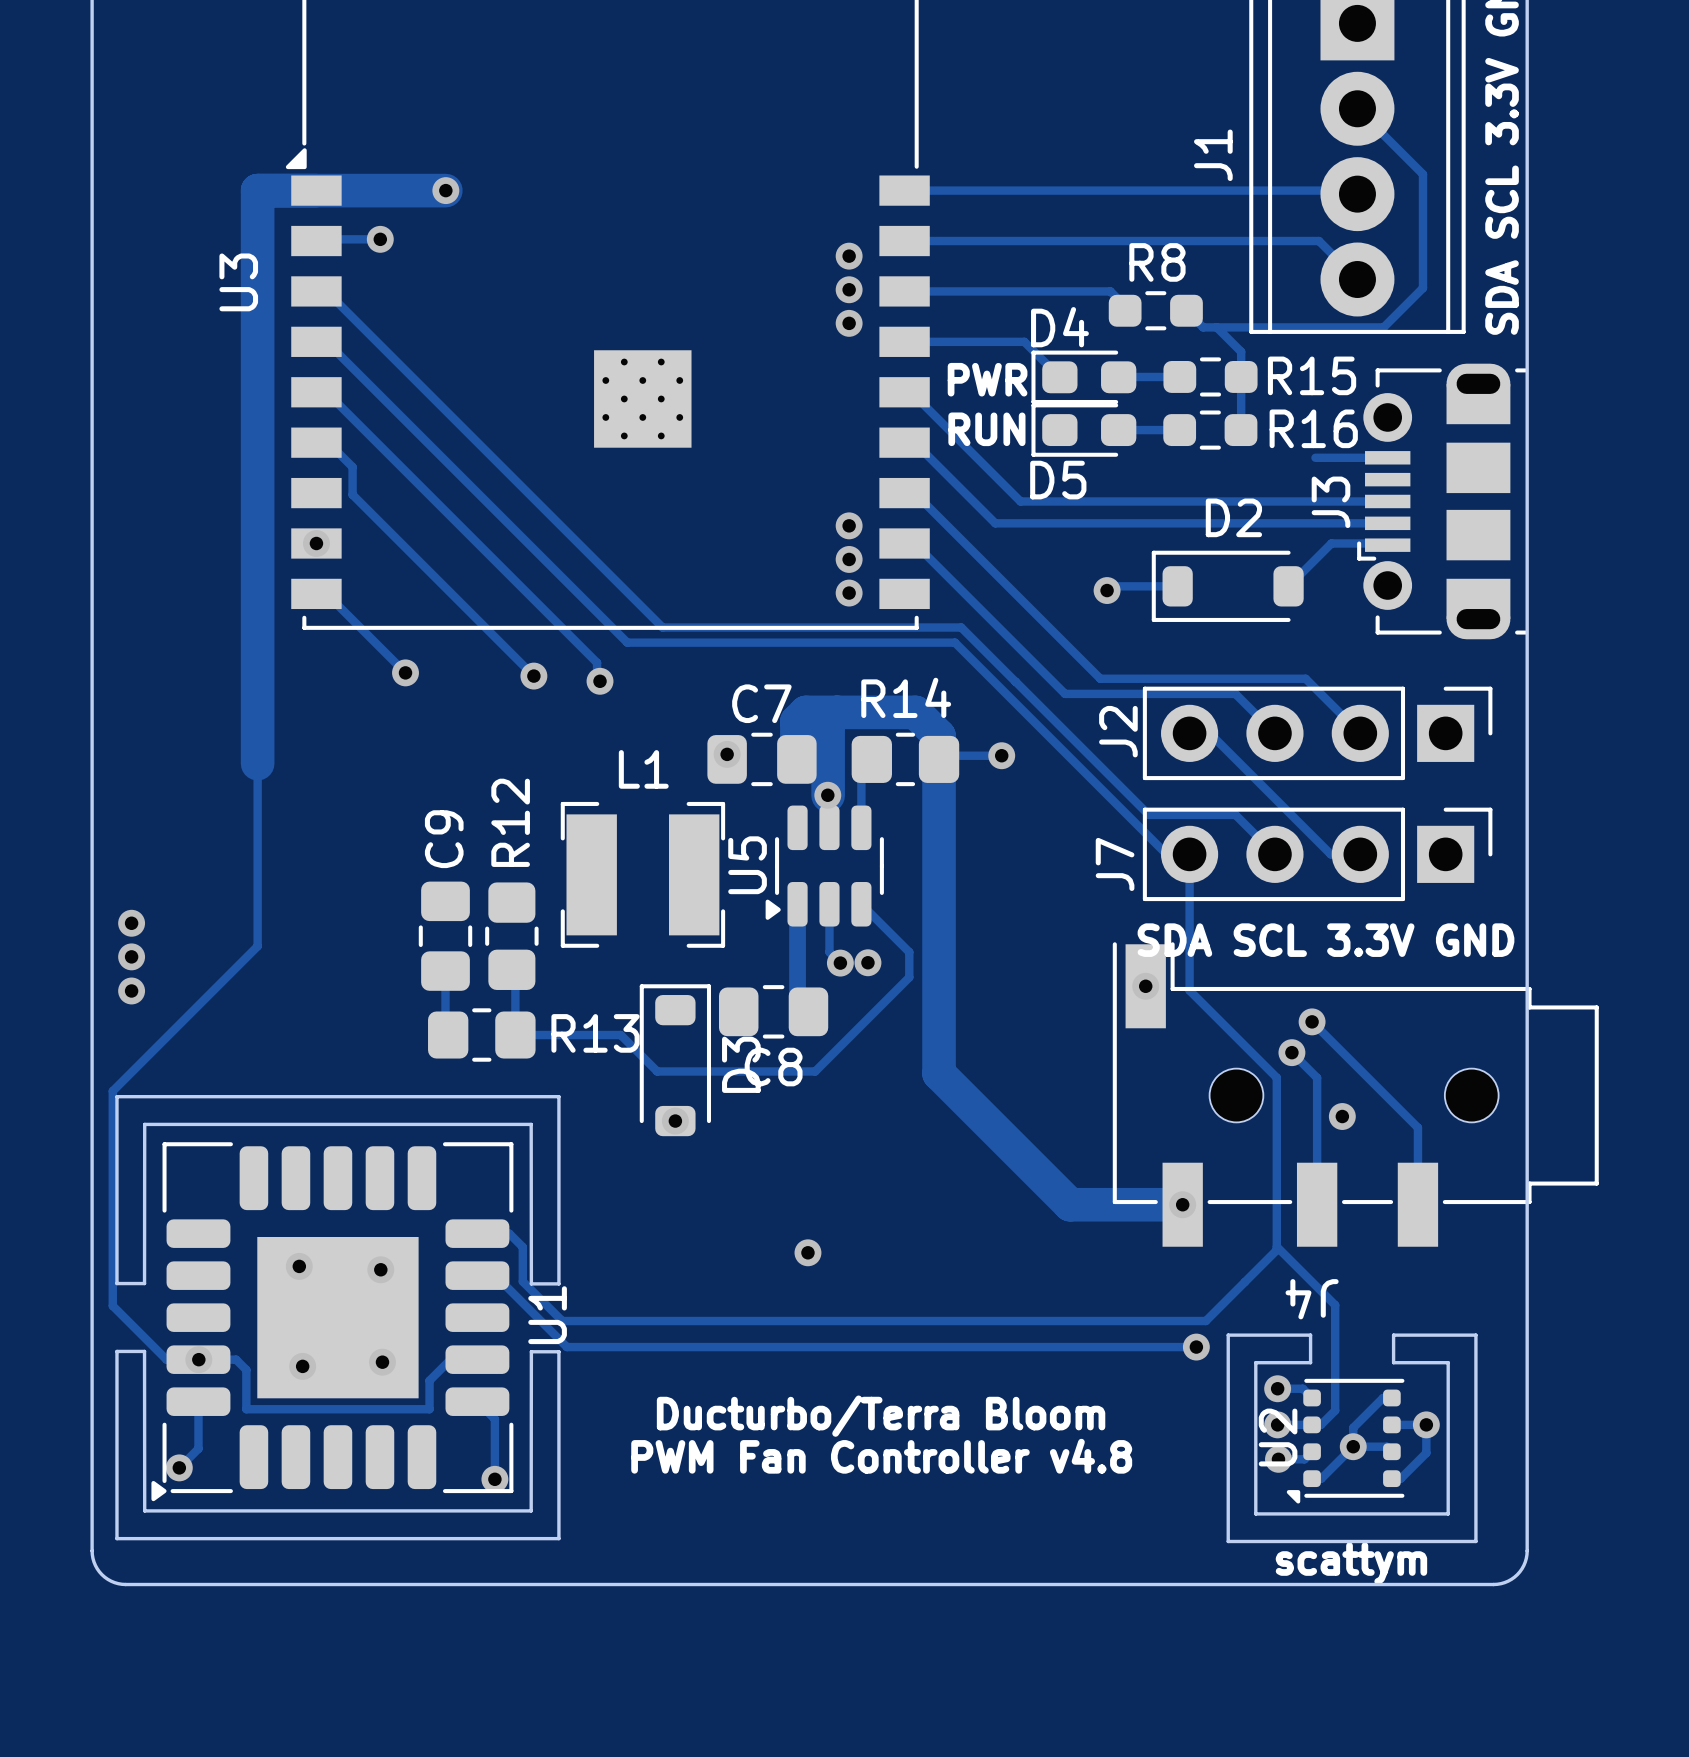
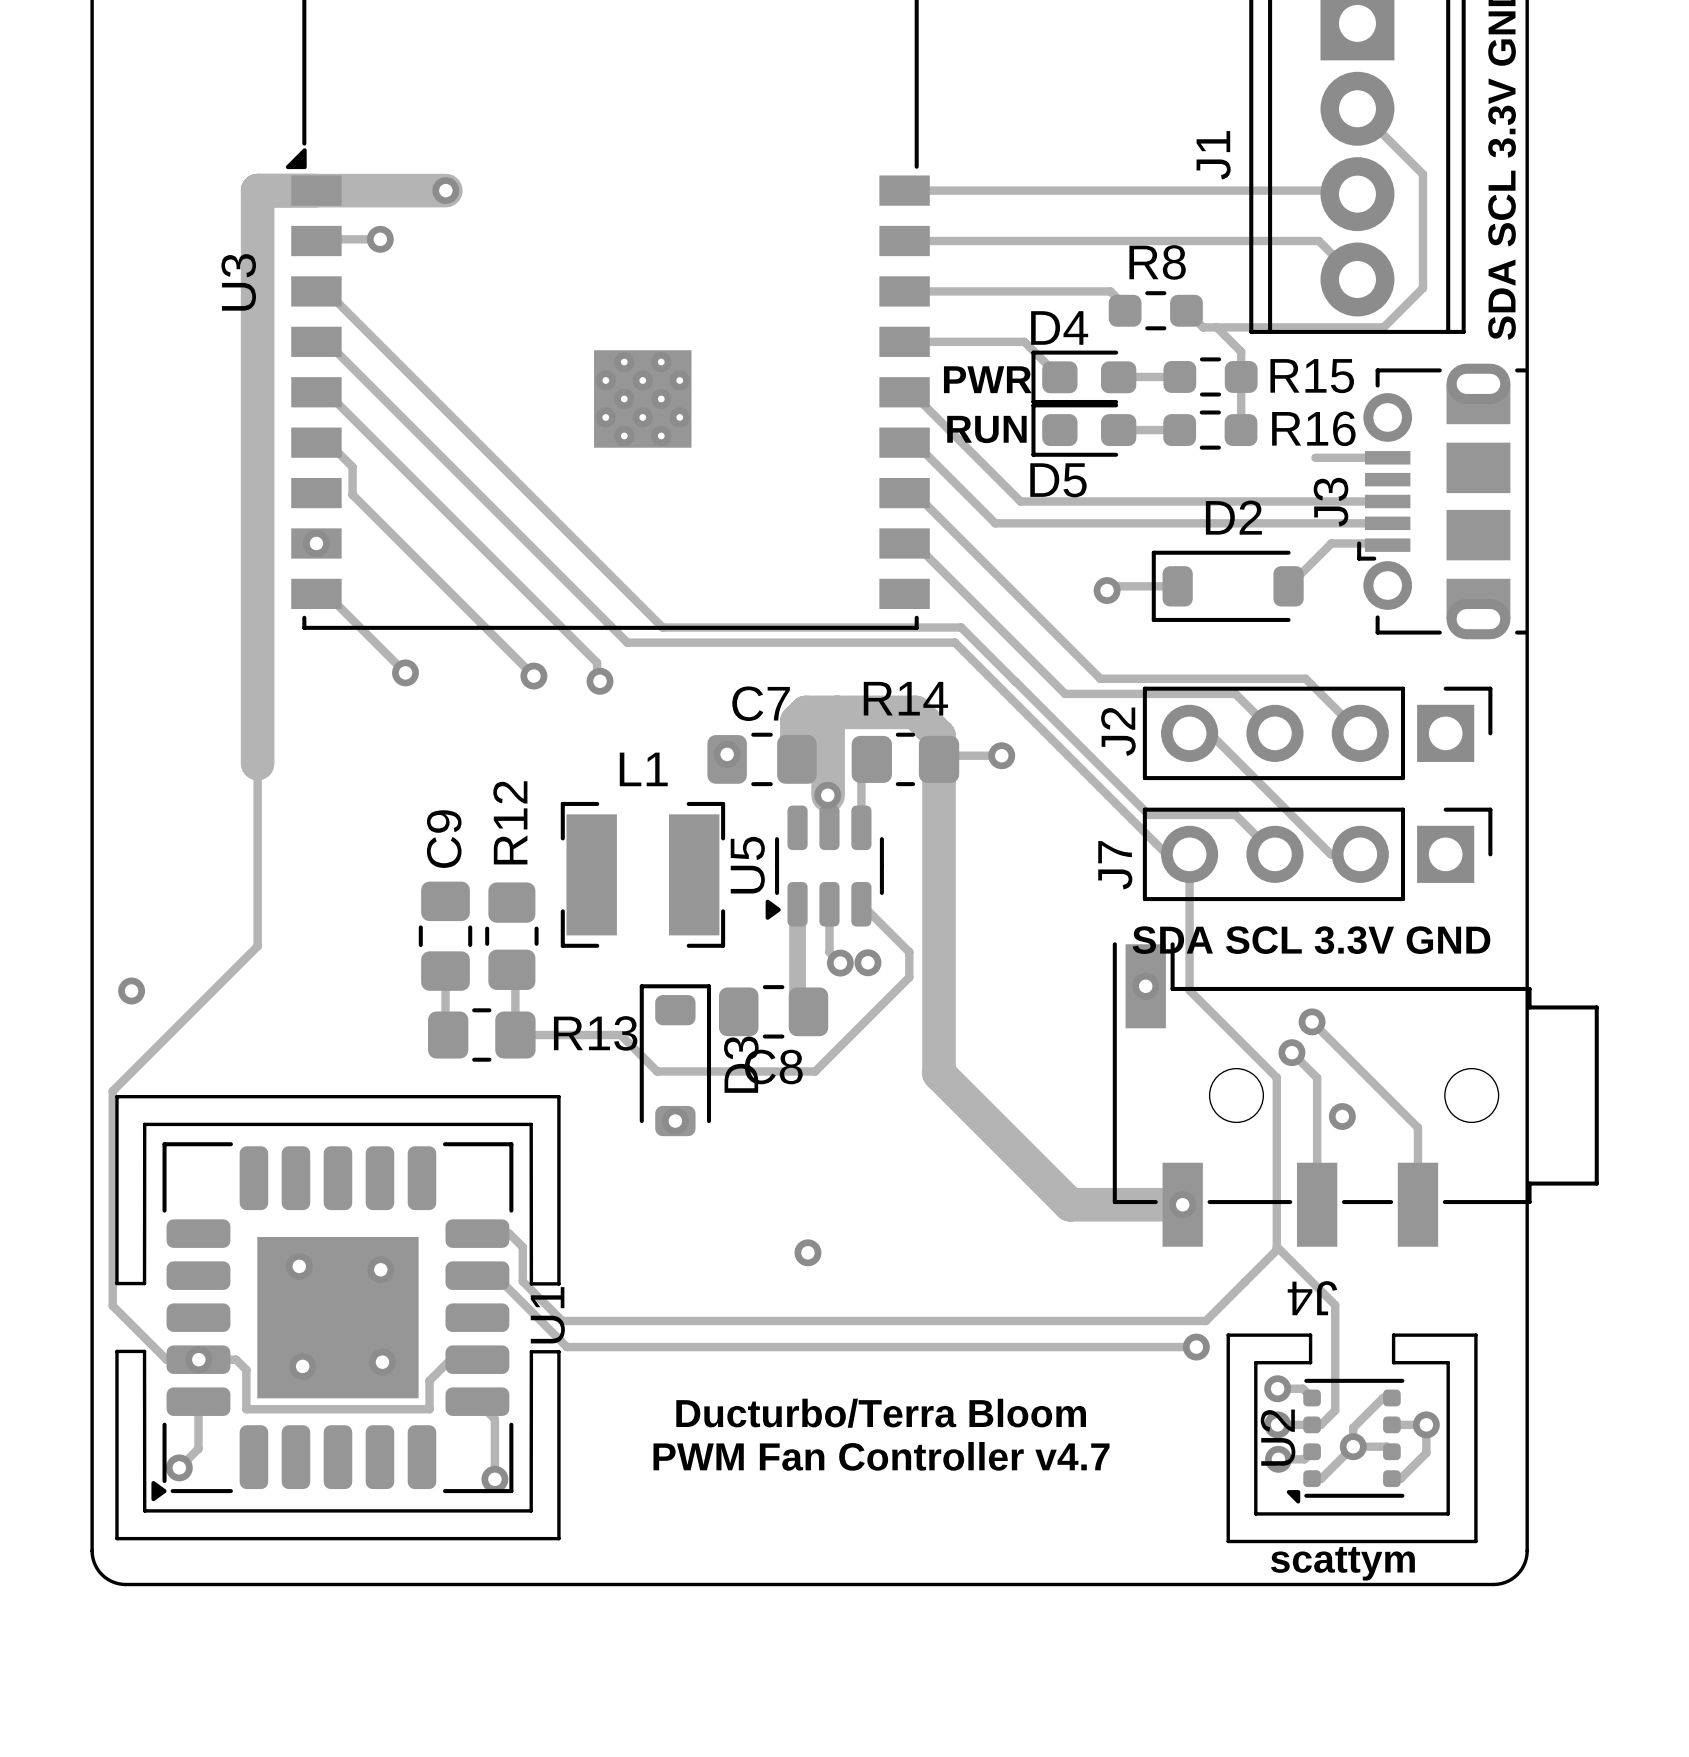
via: (849, 256) -> none
via: (849, 289) -> none
via: (849, 323) -> none
via: (849, 525) -> none
via: (849, 559) -> none
via: (849, 593) -> none
via: (131, 923) -> none
via: (131, 956) -> none
text: PWM Fan Controller v4.8 (881, 1456) -> PWM Fan Controller v4.7 (881, 1456)

